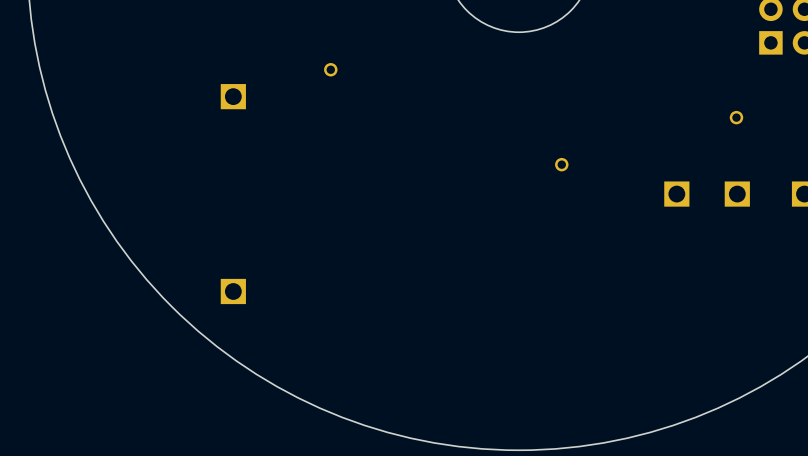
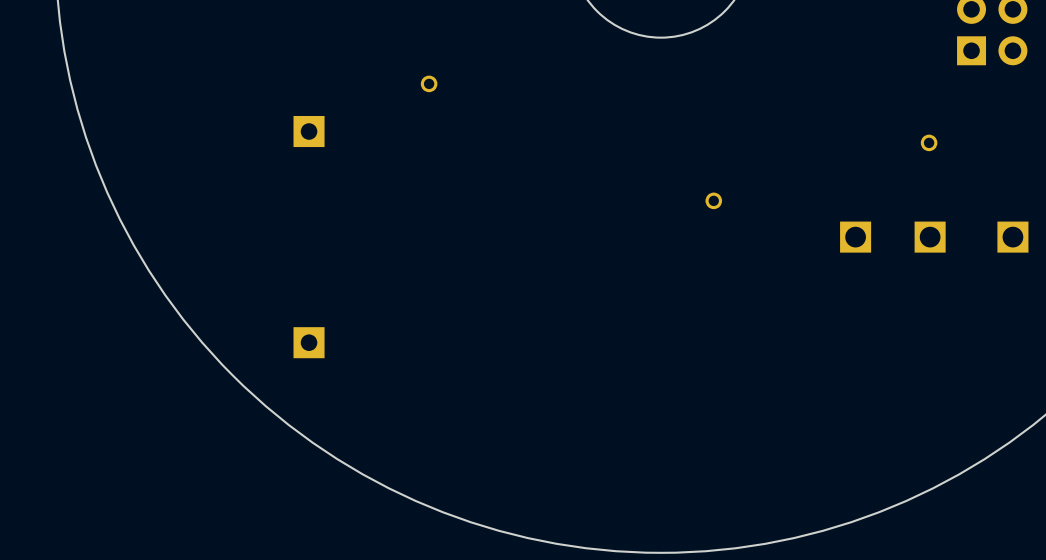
part footprint: [220, 84, 246, 110] -> [293, 115, 325, 148]
part footprint: [220, 278, 246, 305] -> [293, 327, 325, 359]

